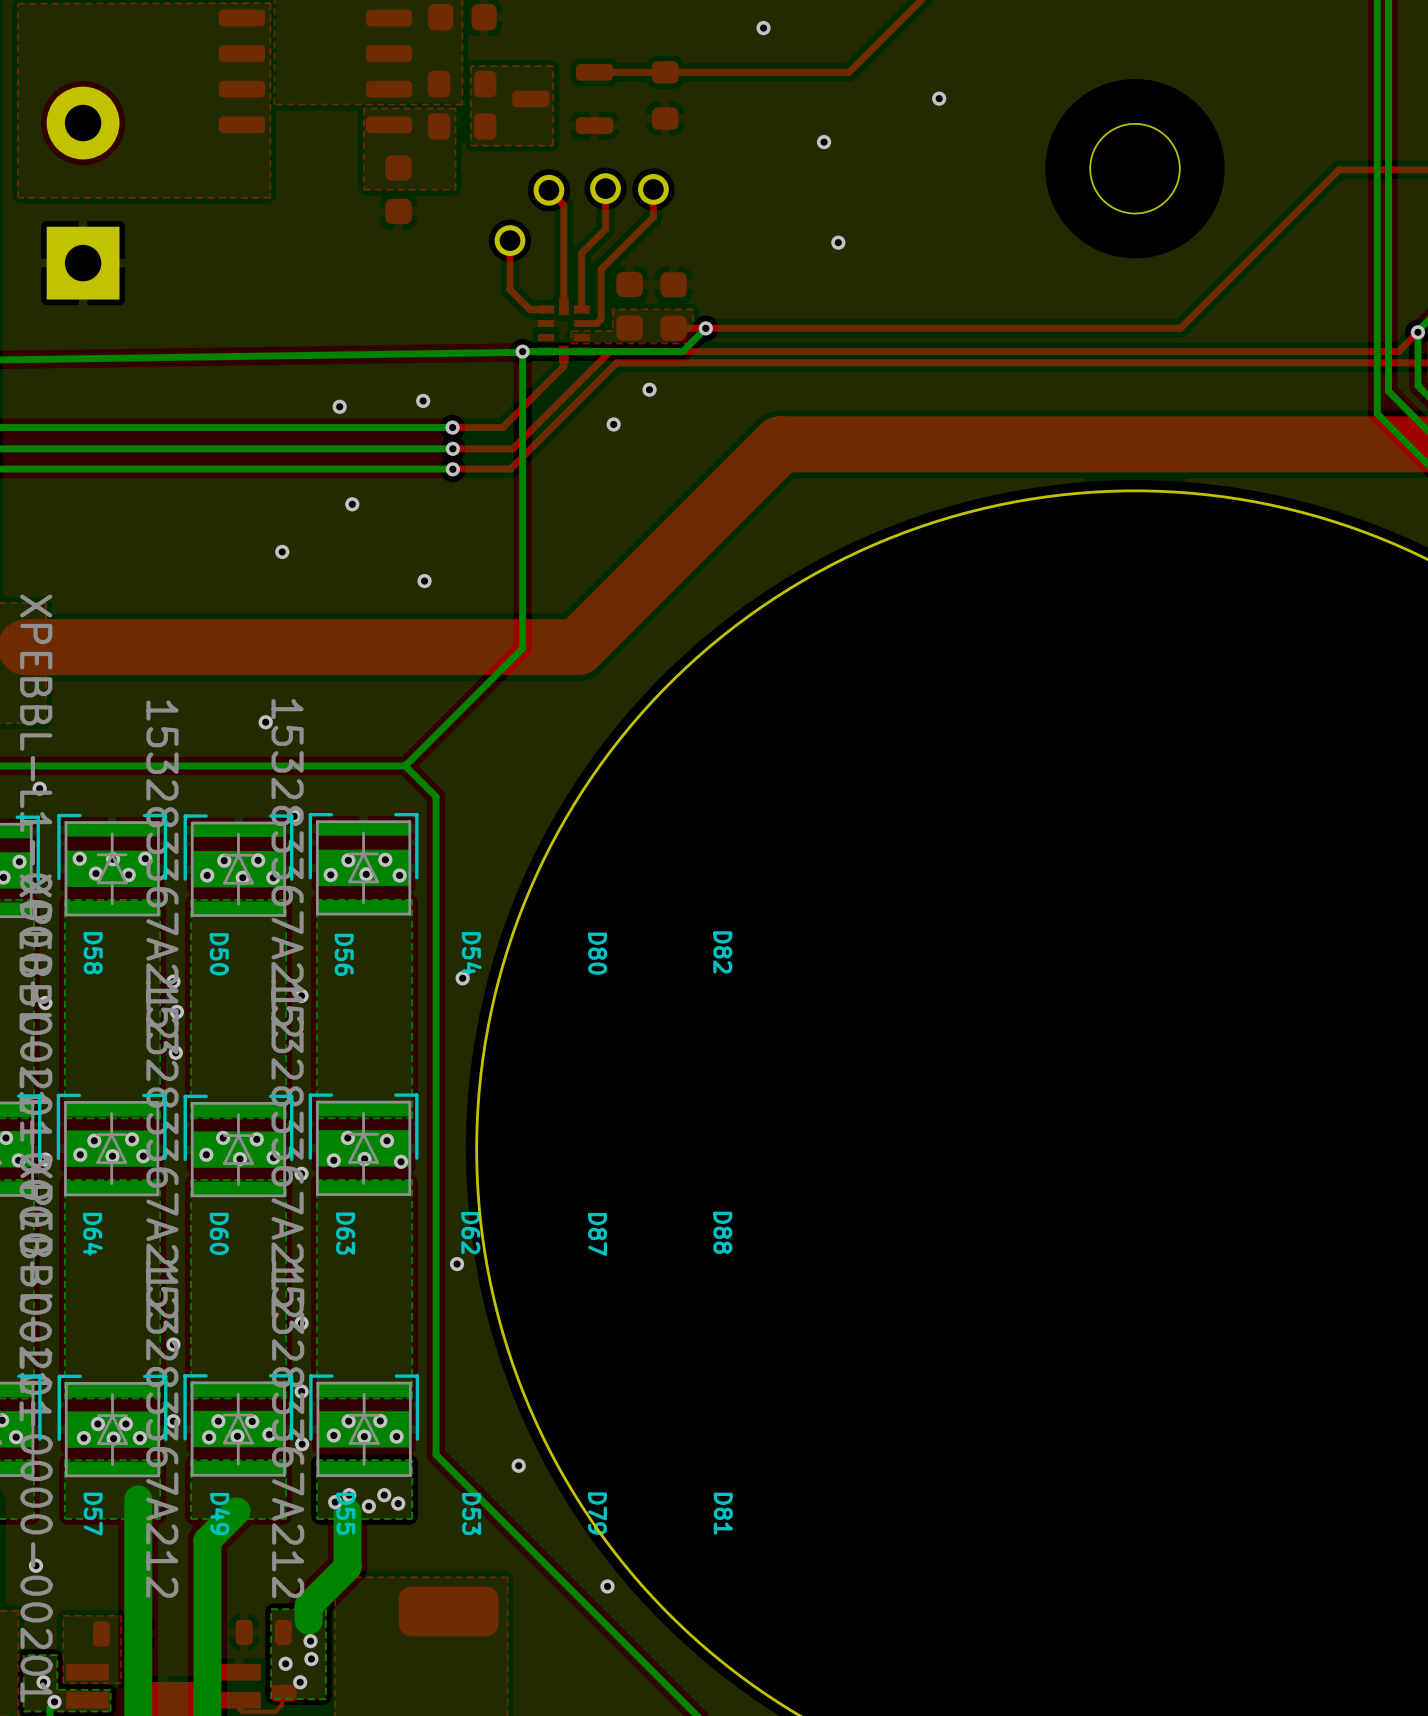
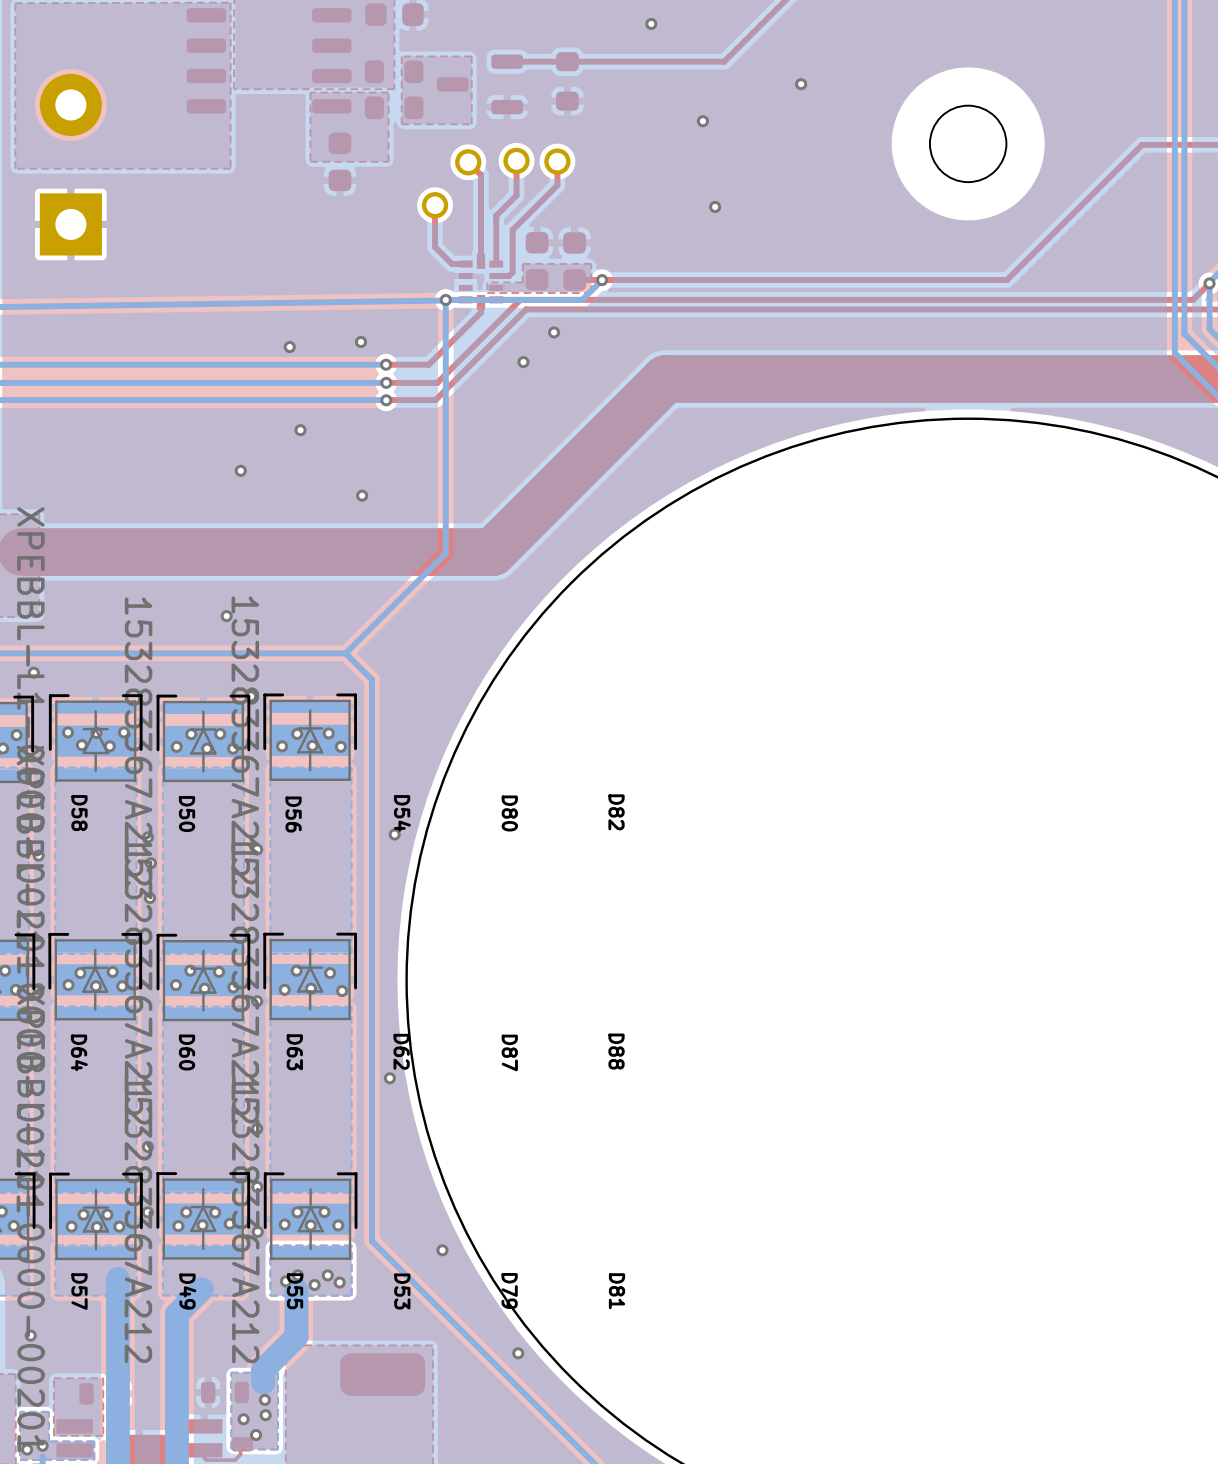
via: (43, 1682) -> none
via: none -> (42, 1445)
via: none -> (27, 1449)
via: (54, 1701) -> none

